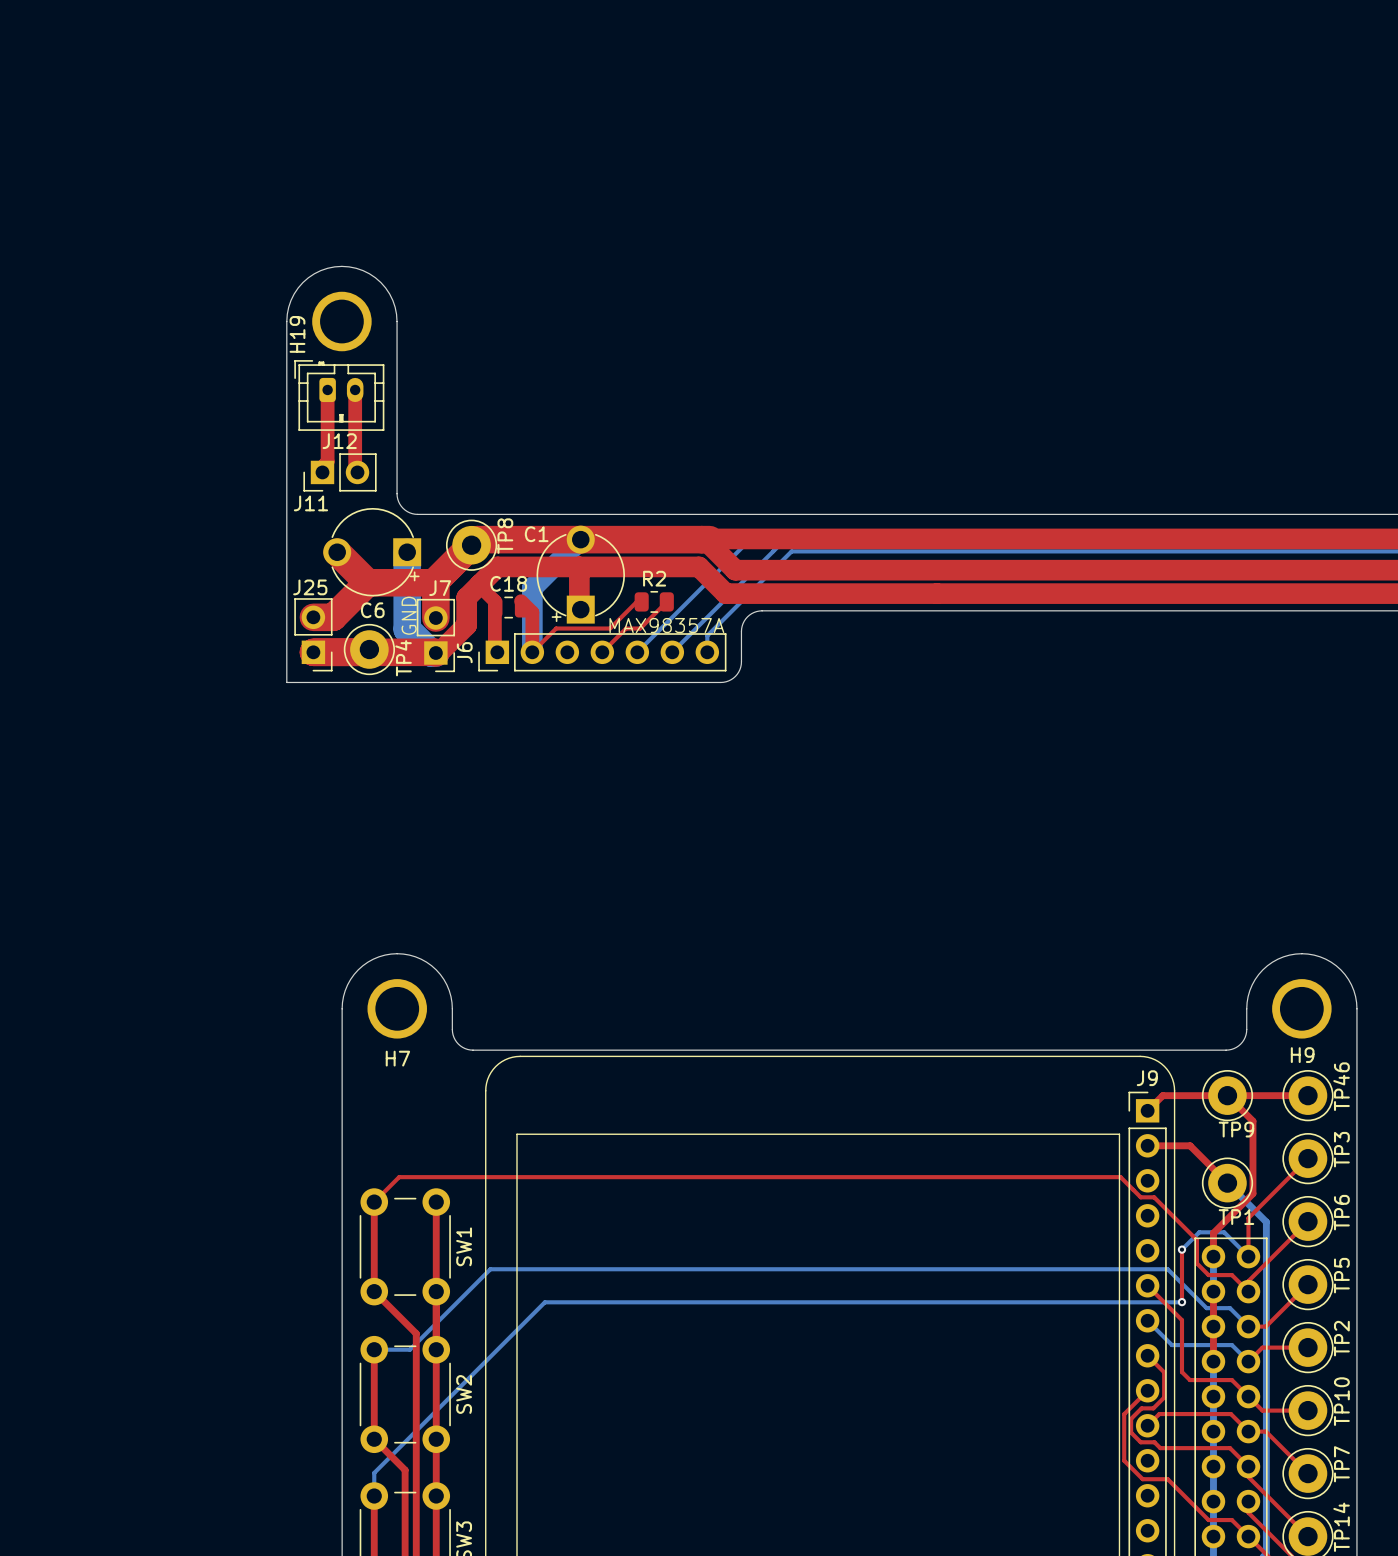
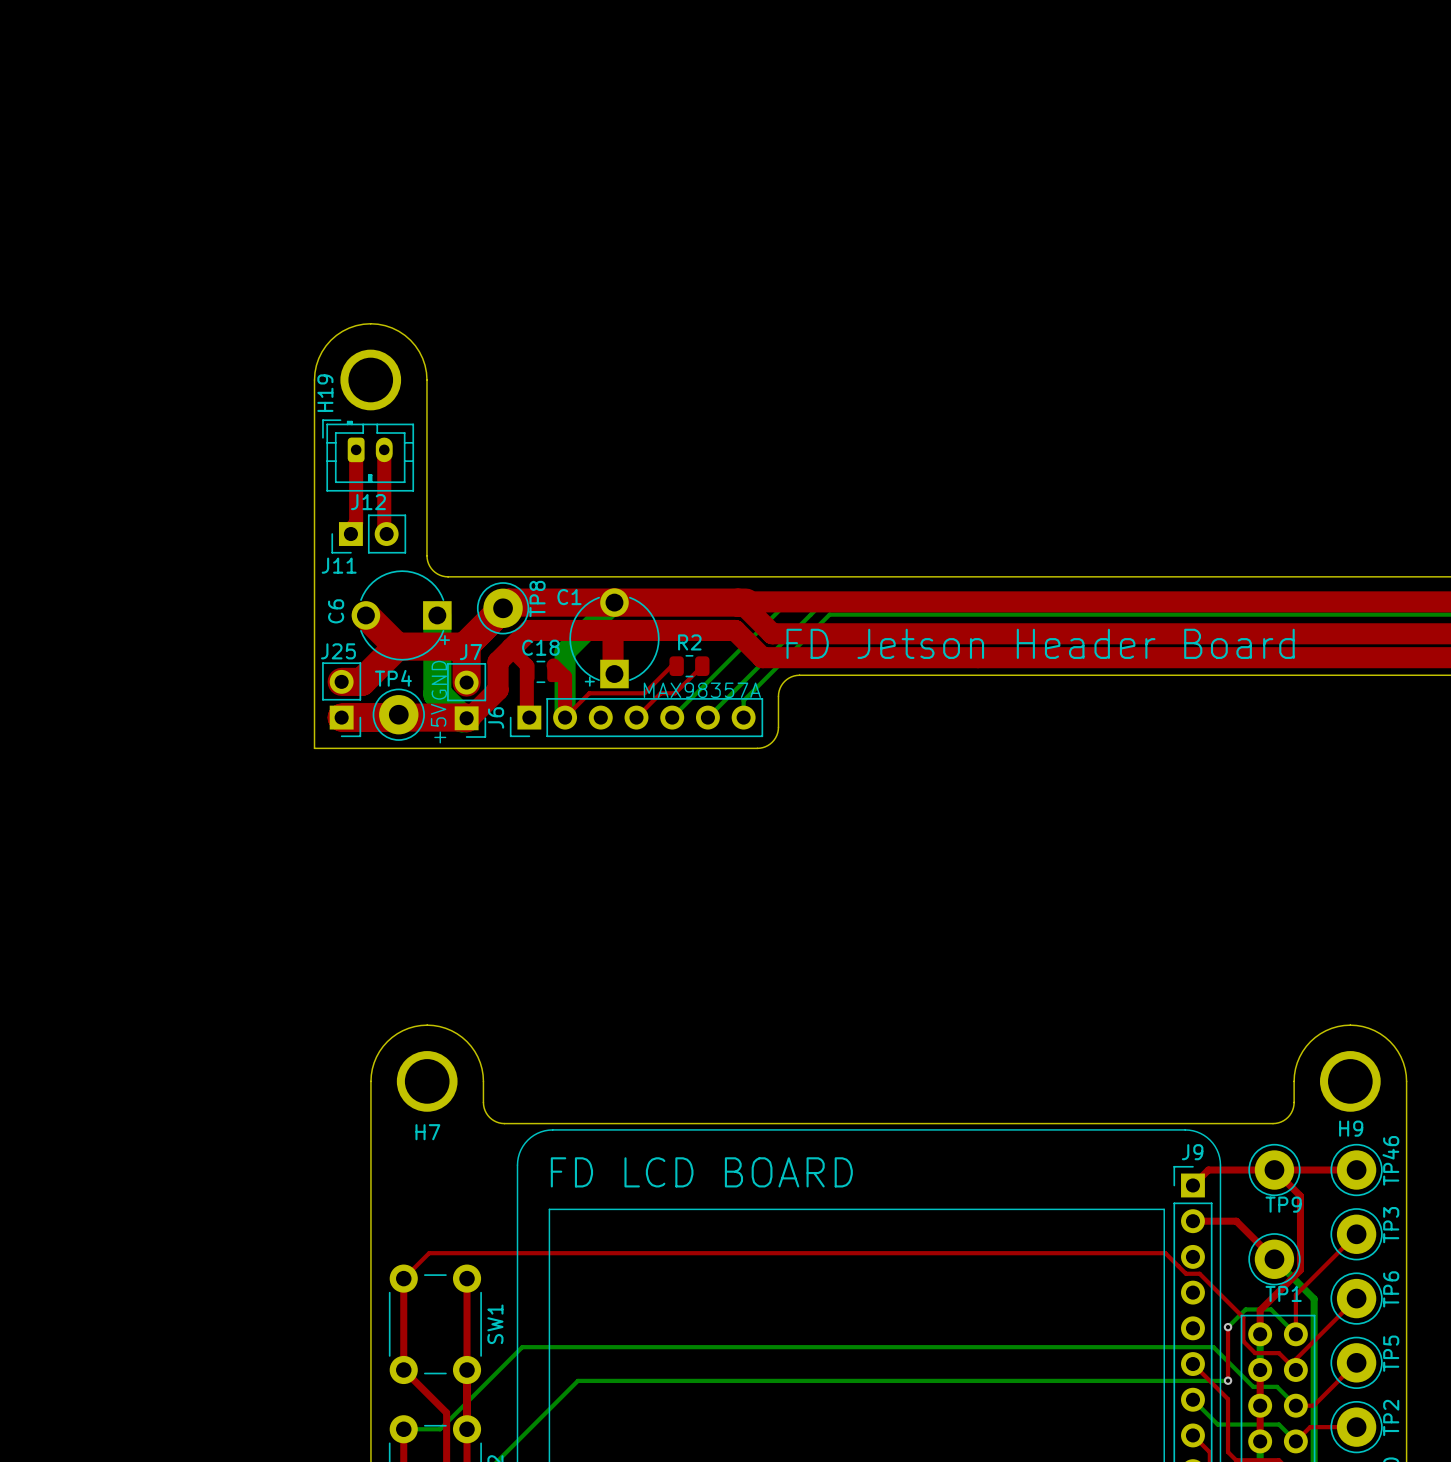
text: none -> FD Jetson Header Board (1040, 643)
C6 name rotation: 0° (372, 610) -> 90° counterclockwise (336, 611)
C6 name position: C6 (372, 610) -> C6 (336, 611)
TP4 name rotation: 0° (403, 658) -> 90° clockwise (393, 678)
TP4 name position: TP4 (403, 658) -> TP4 (393, 678)
text: none -> +5V (438, 723)
text: none -> FD LCD BOARD (701, 1172)

